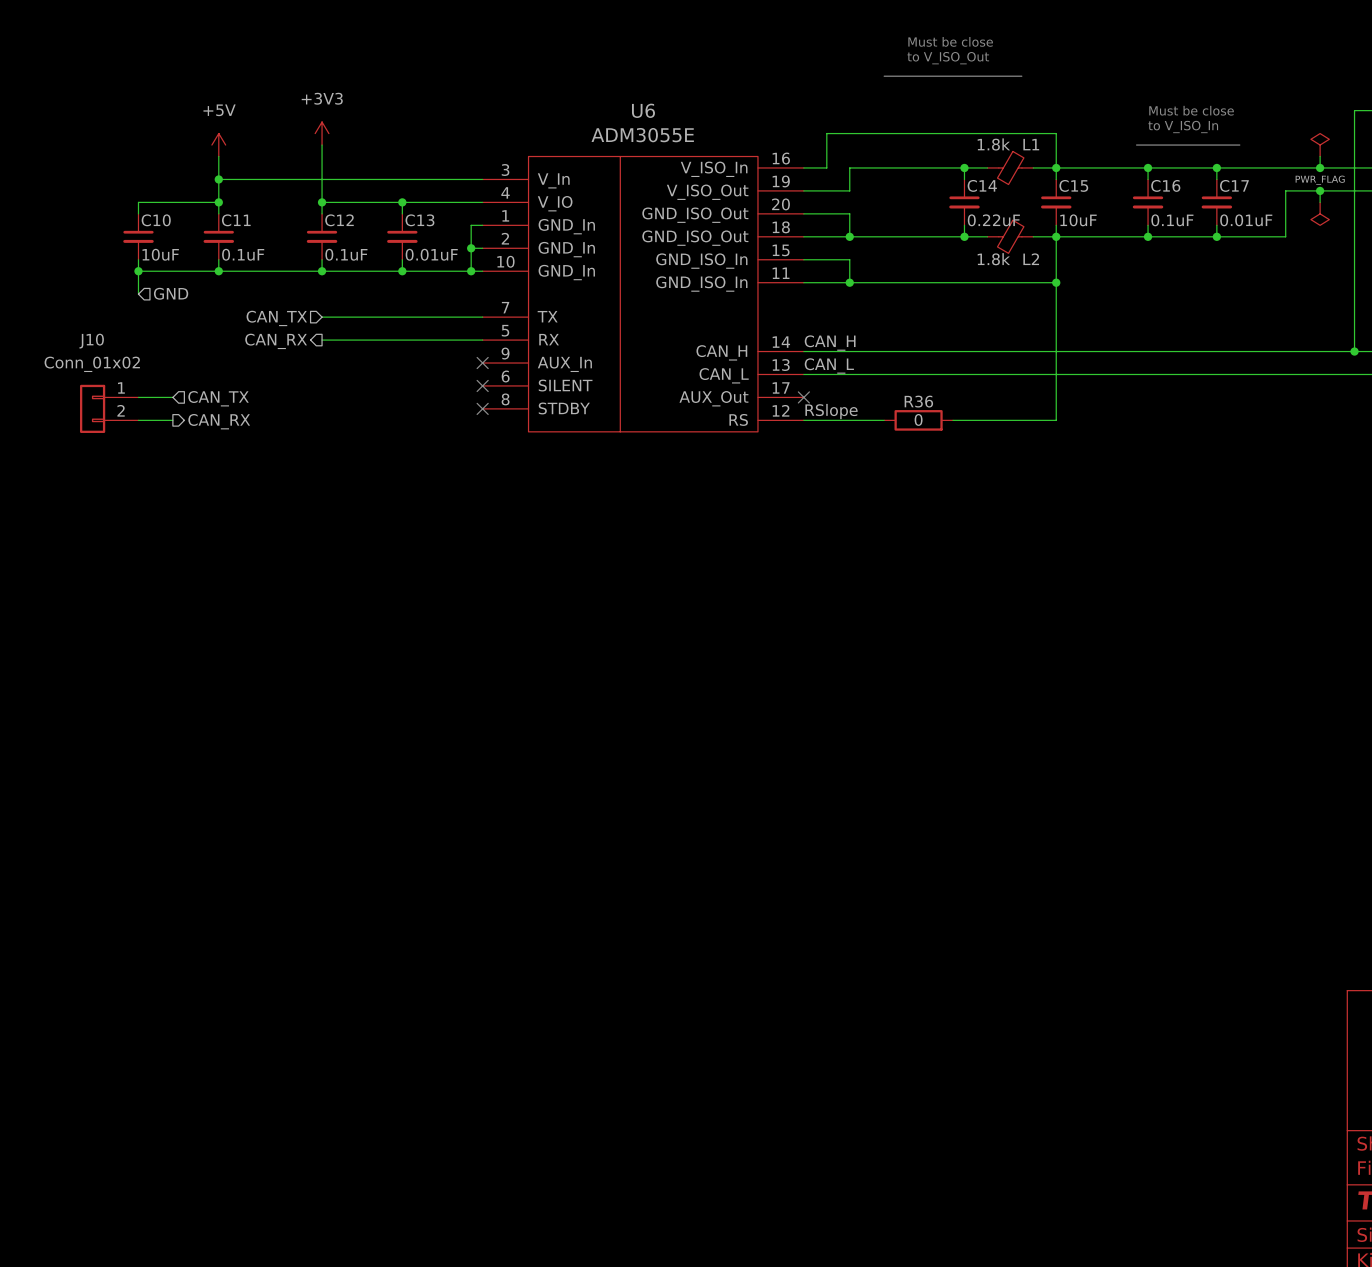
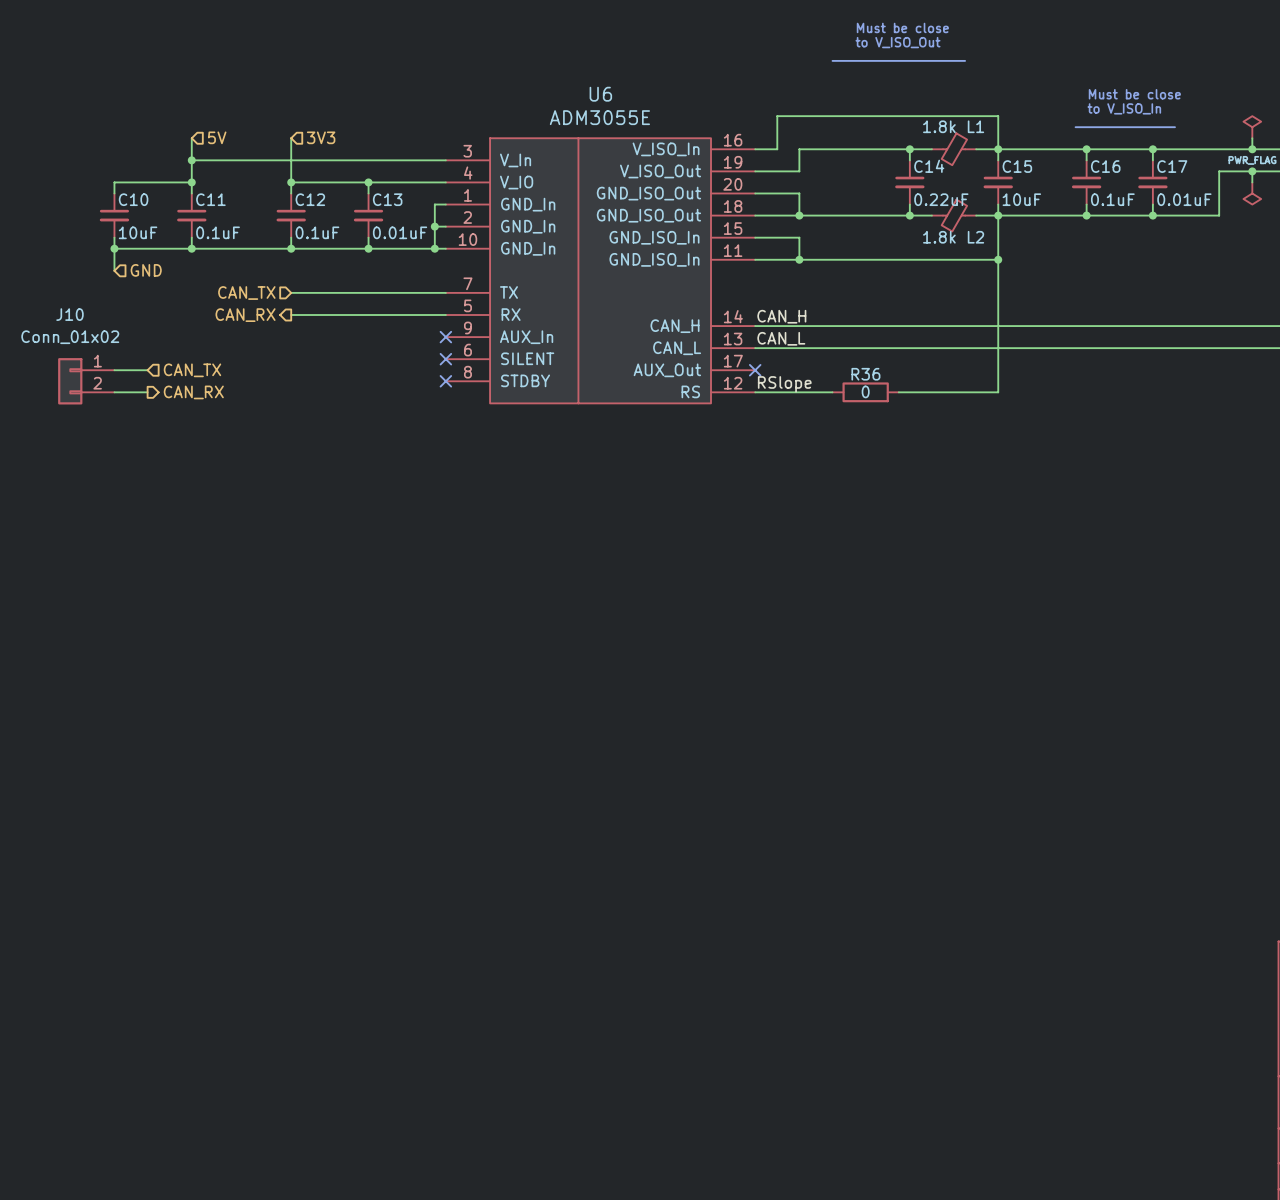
power symbol: +3V3 (322, 133) -> none
power symbol: +5V (218, 145) -> none
wire: (322, 145) (322, 156) -> none
hierarchical label: none -> 5V (217, 137)
hierarchical label: none -> 3V3 (321, 137)

